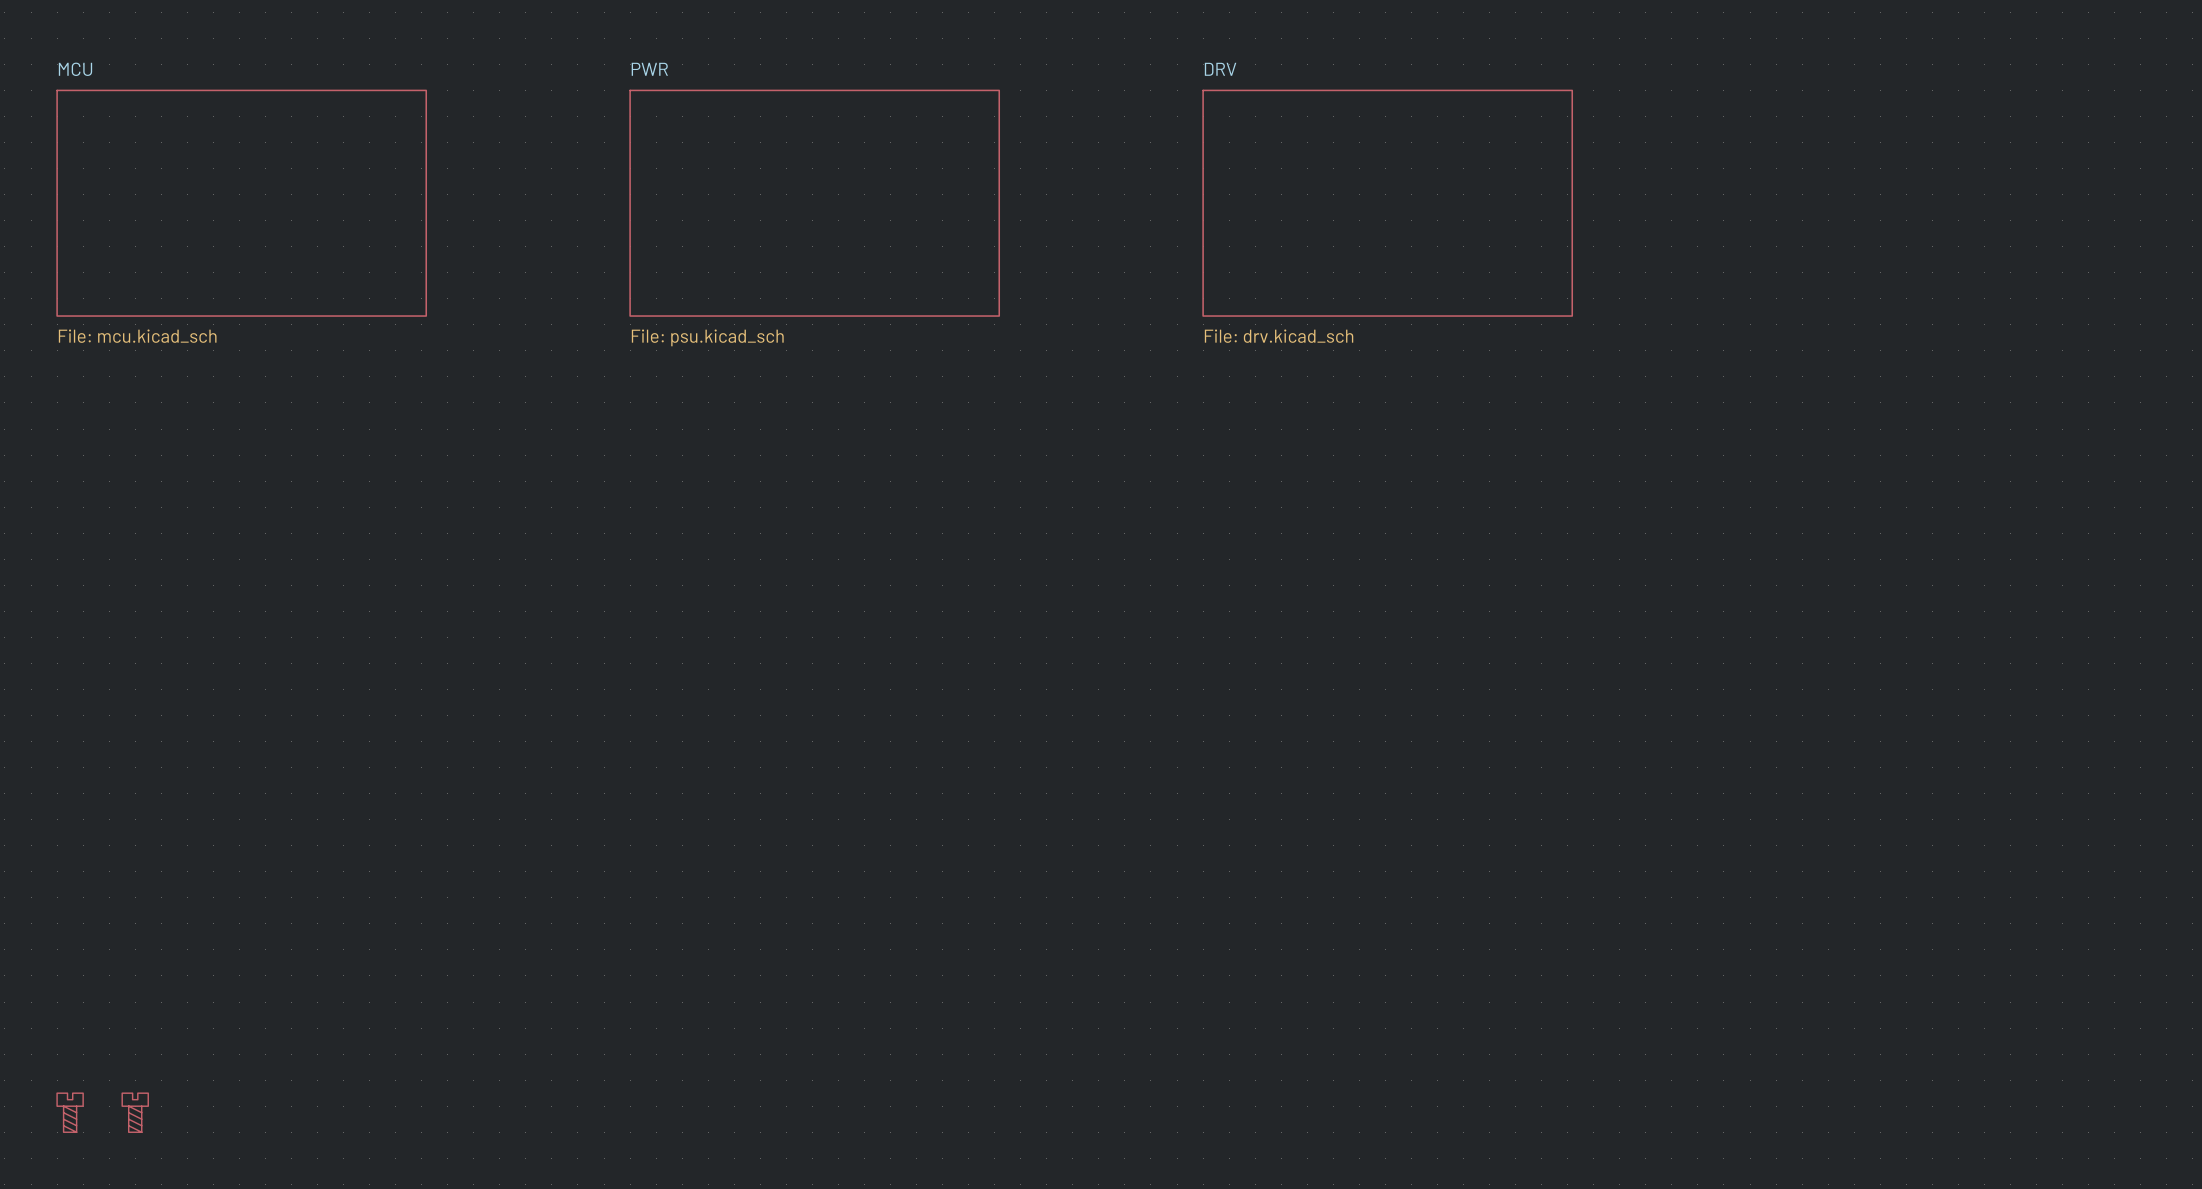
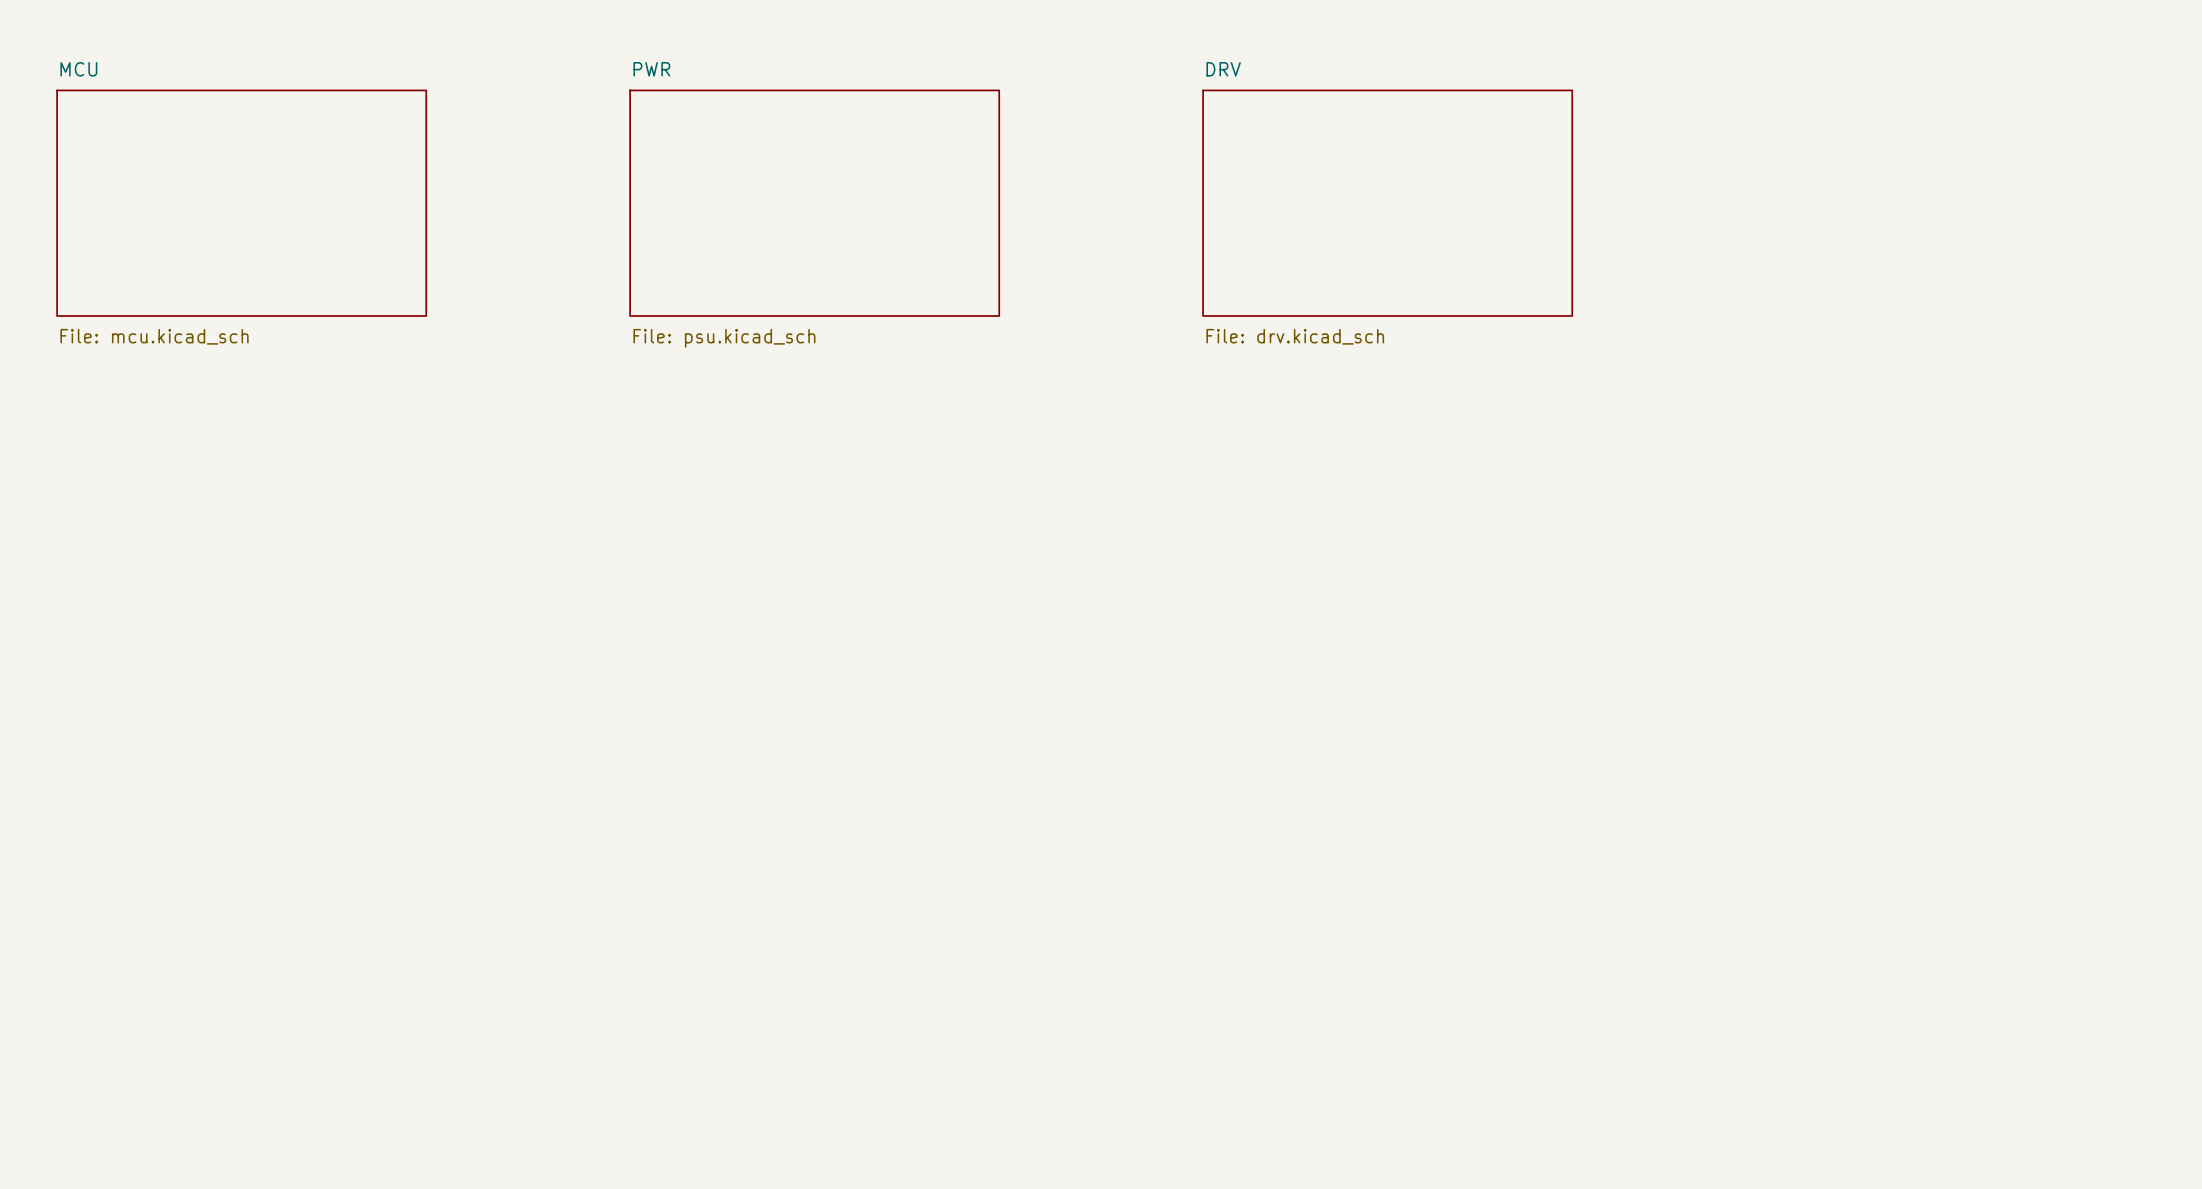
part: (70, 1112) -> none
part: (135, 1112) -> none

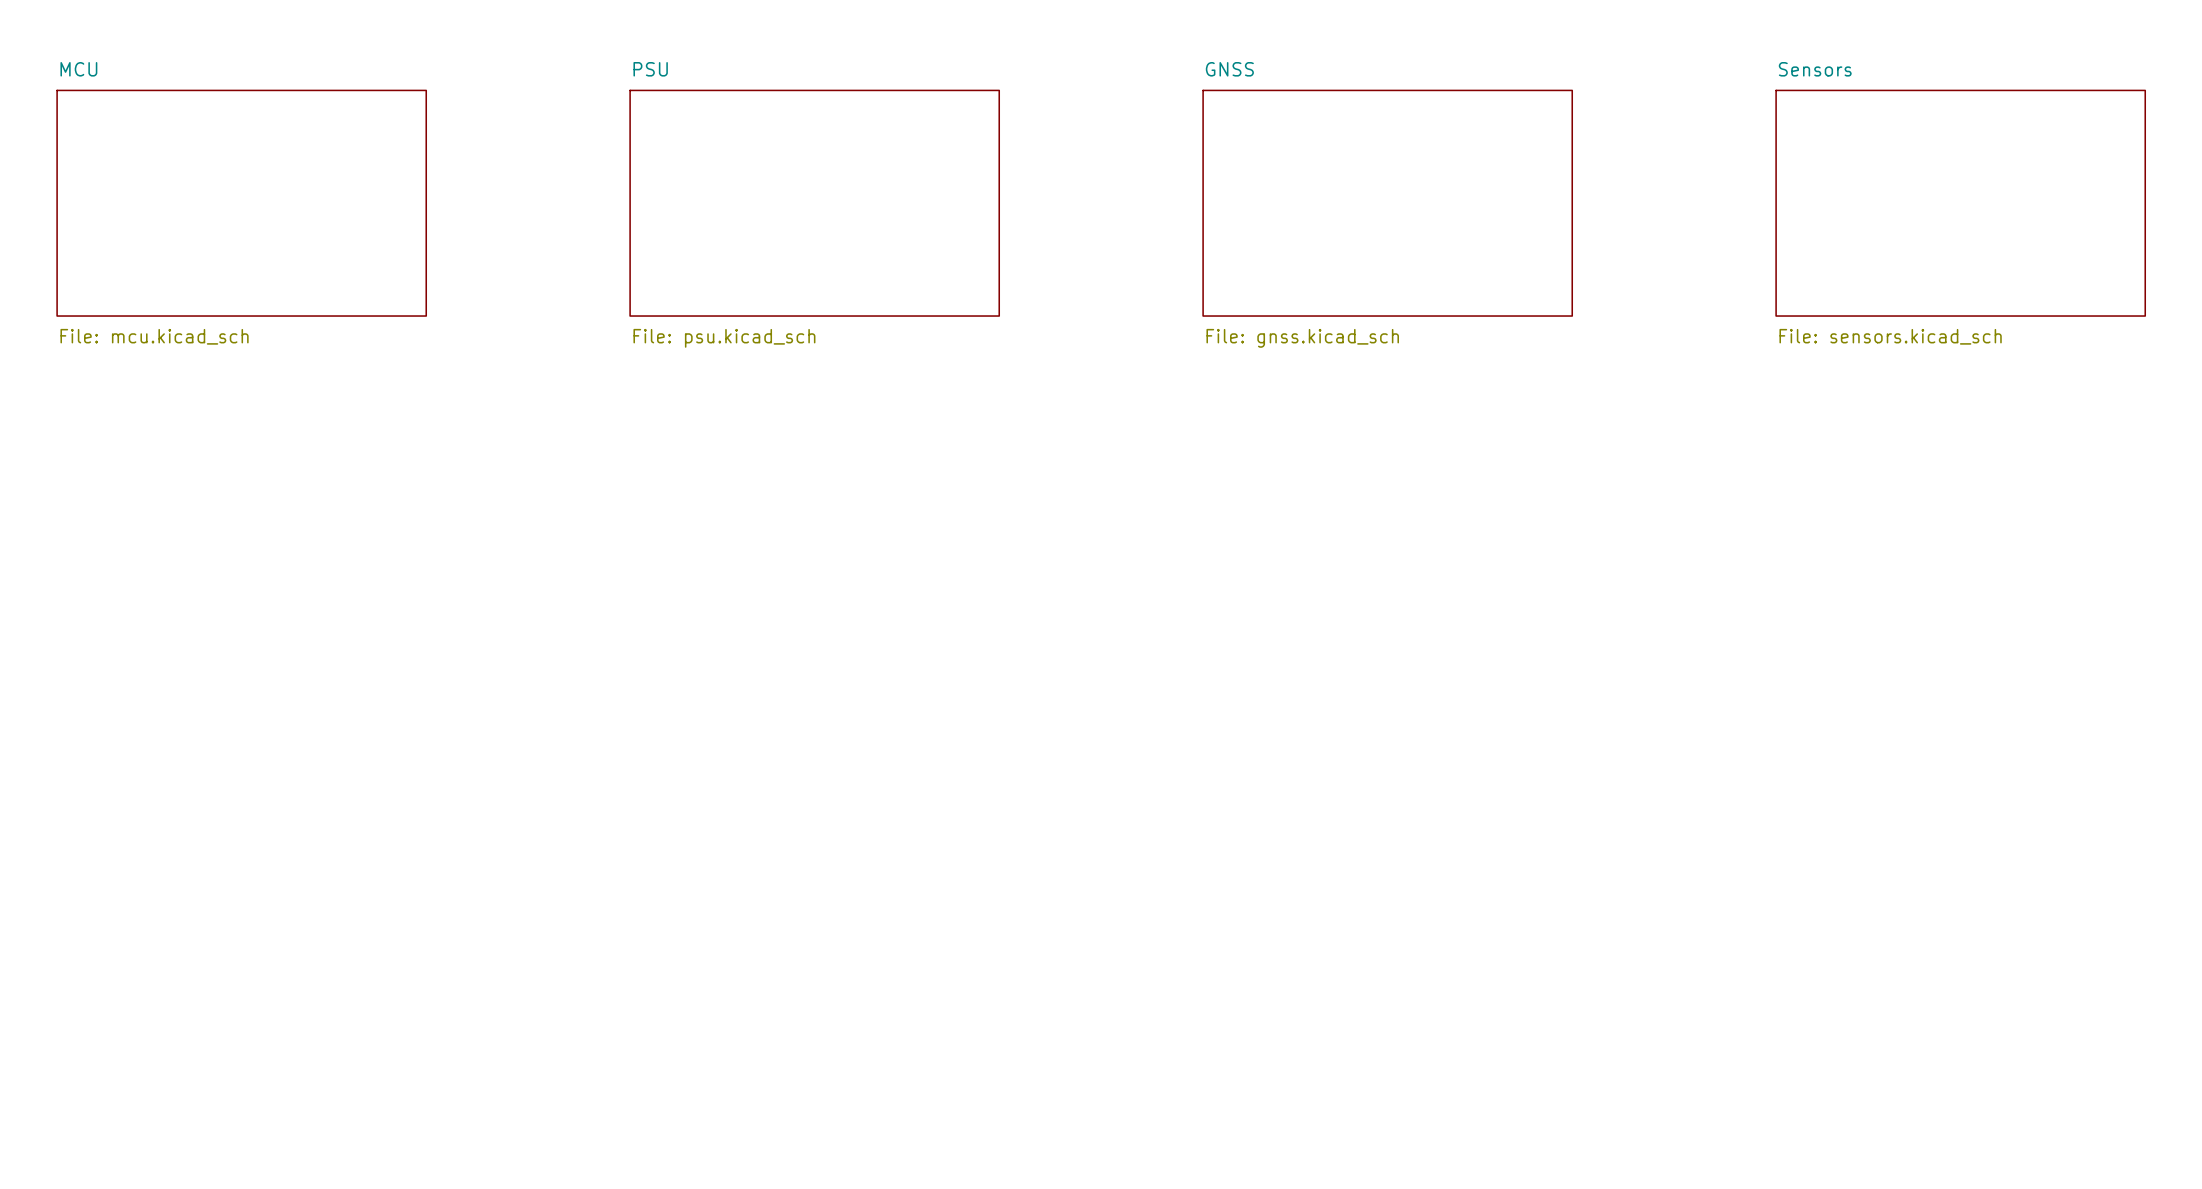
sheet PWR name: PWR (651, 69) -> PSU (650, 69)
sheet DRV name: DRV (1223, 69) -> GNSS (1229, 69)
sheet Sensors: none -> File: sensors.kicad_sch (1960, 203)
sheet DRV value: File: drv.kicad_sch (1295, 336) -> File: gnss.kicad_sch (1302, 338)

